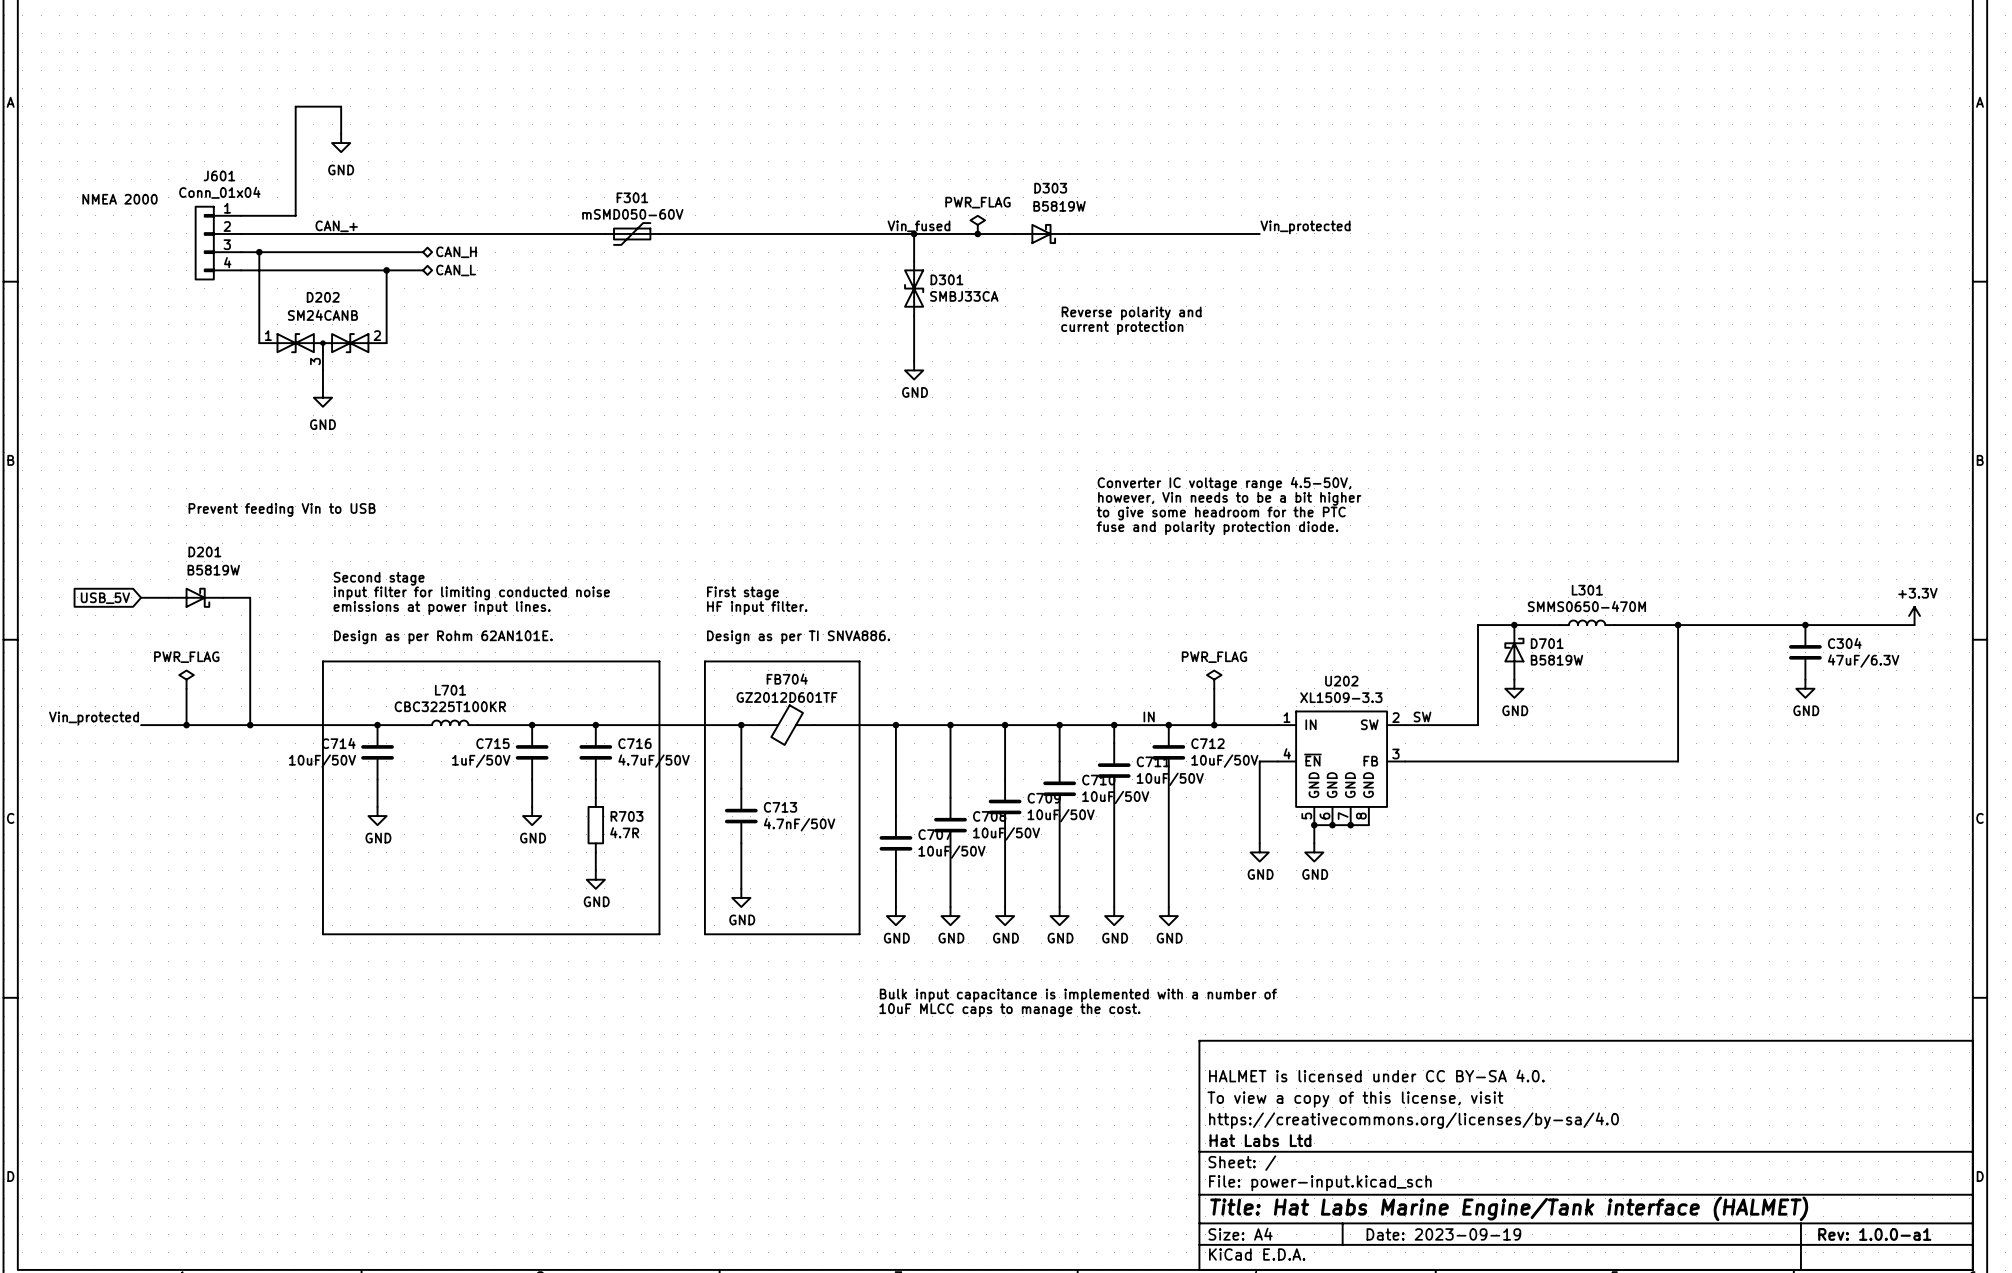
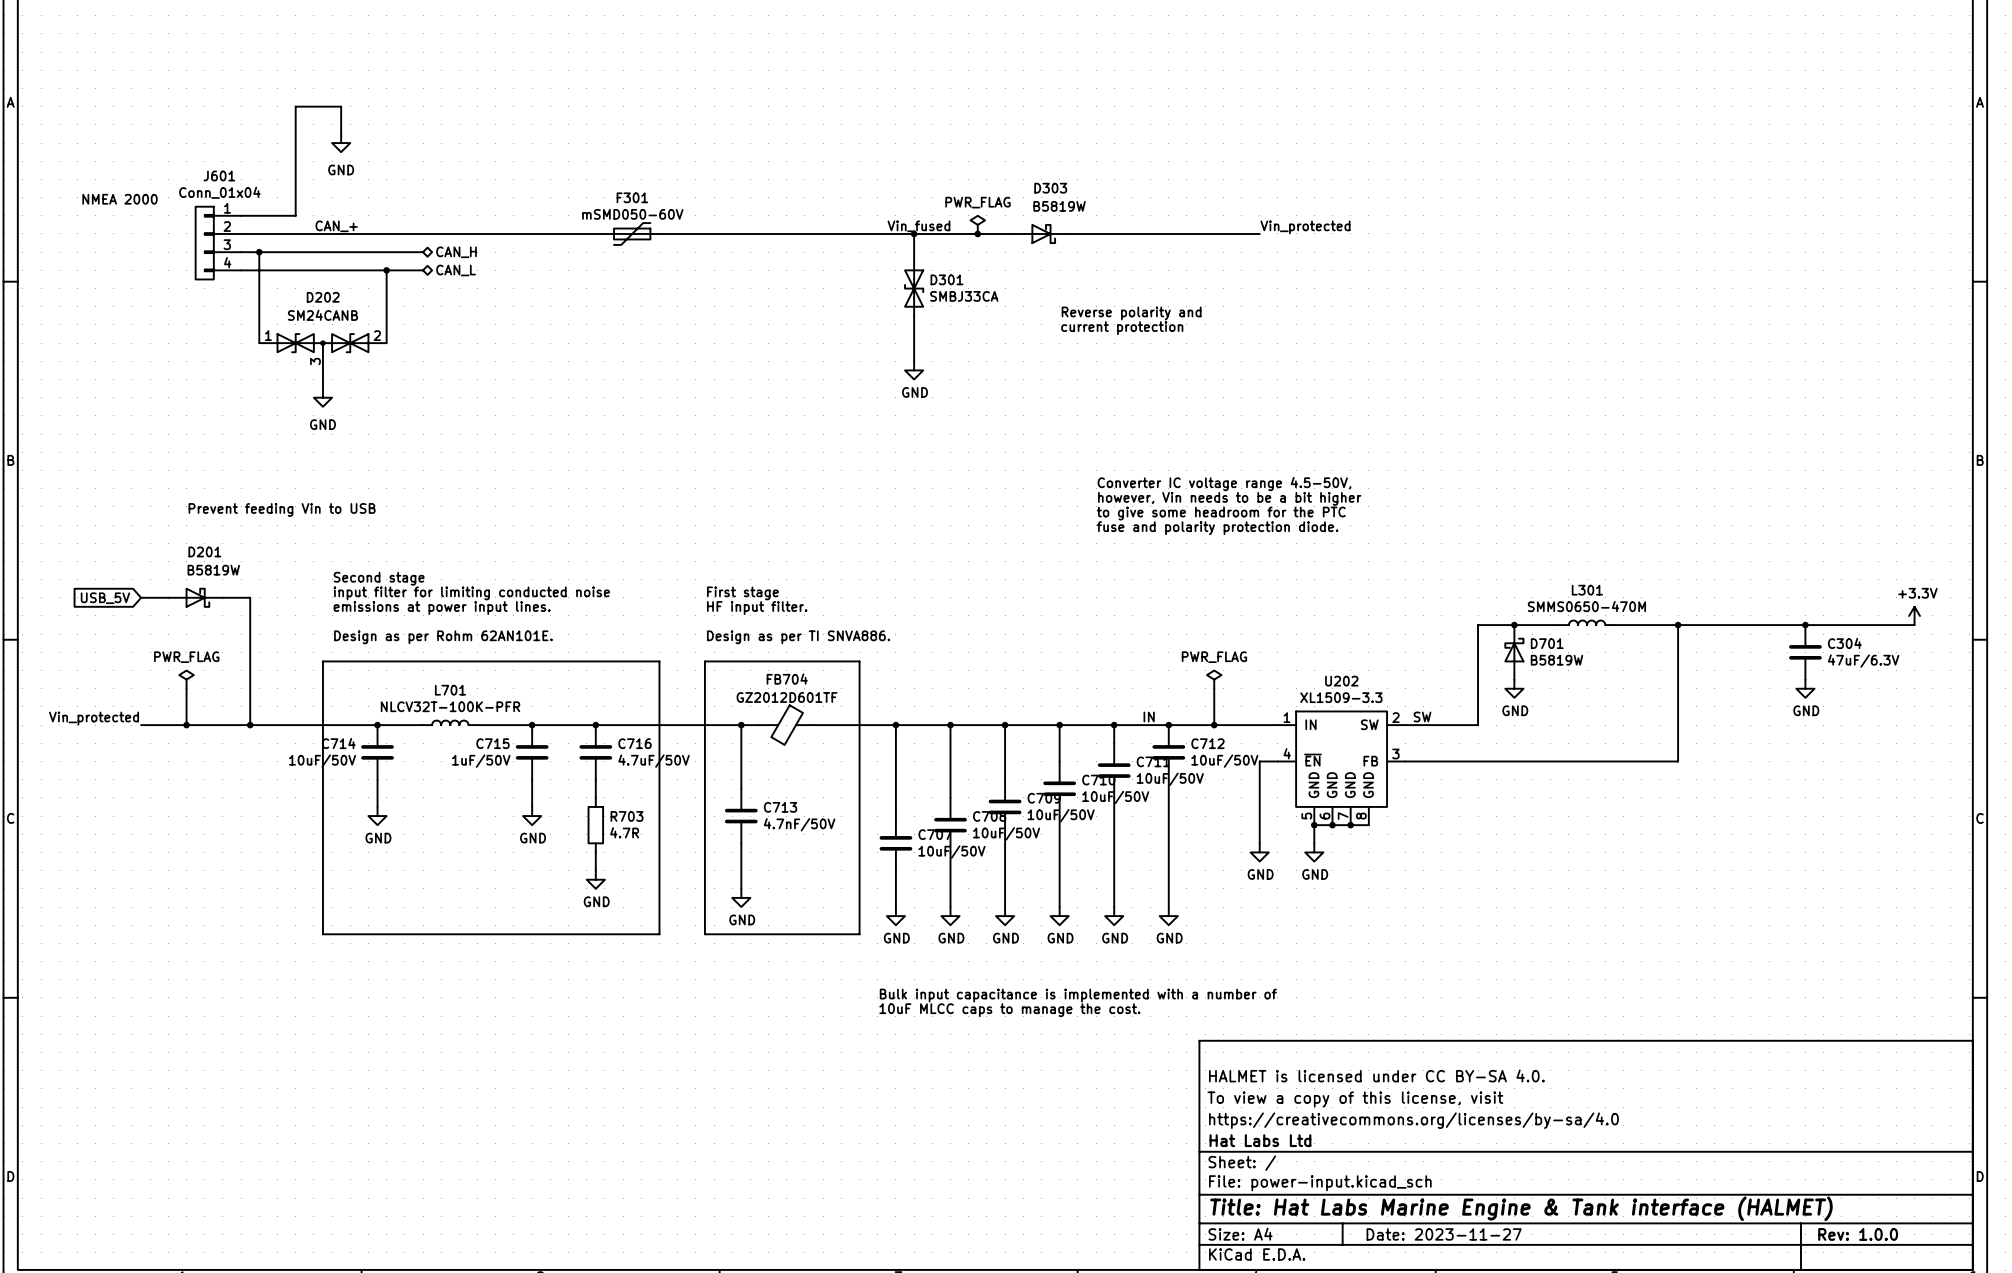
L701 value: CBC3225T100KR (450, 706) -> NLCV32T-100K-PFR (450, 706)
title block: Title: Hat Labs Marine Engine/Tank interface (HALMET) (1509, 1208) -> Title: Hat Labs Marine Engine & Tank interface (HALMET) (1521, 1208)
title block: Date: 2023-09-19 (1443, 1234) -> Date: 2023-11-27 (1444, 1234)
title block: Rev: 1.0.0-a1 (1874, 1234) -> Rev: 1.0.0 (1858, 1234)

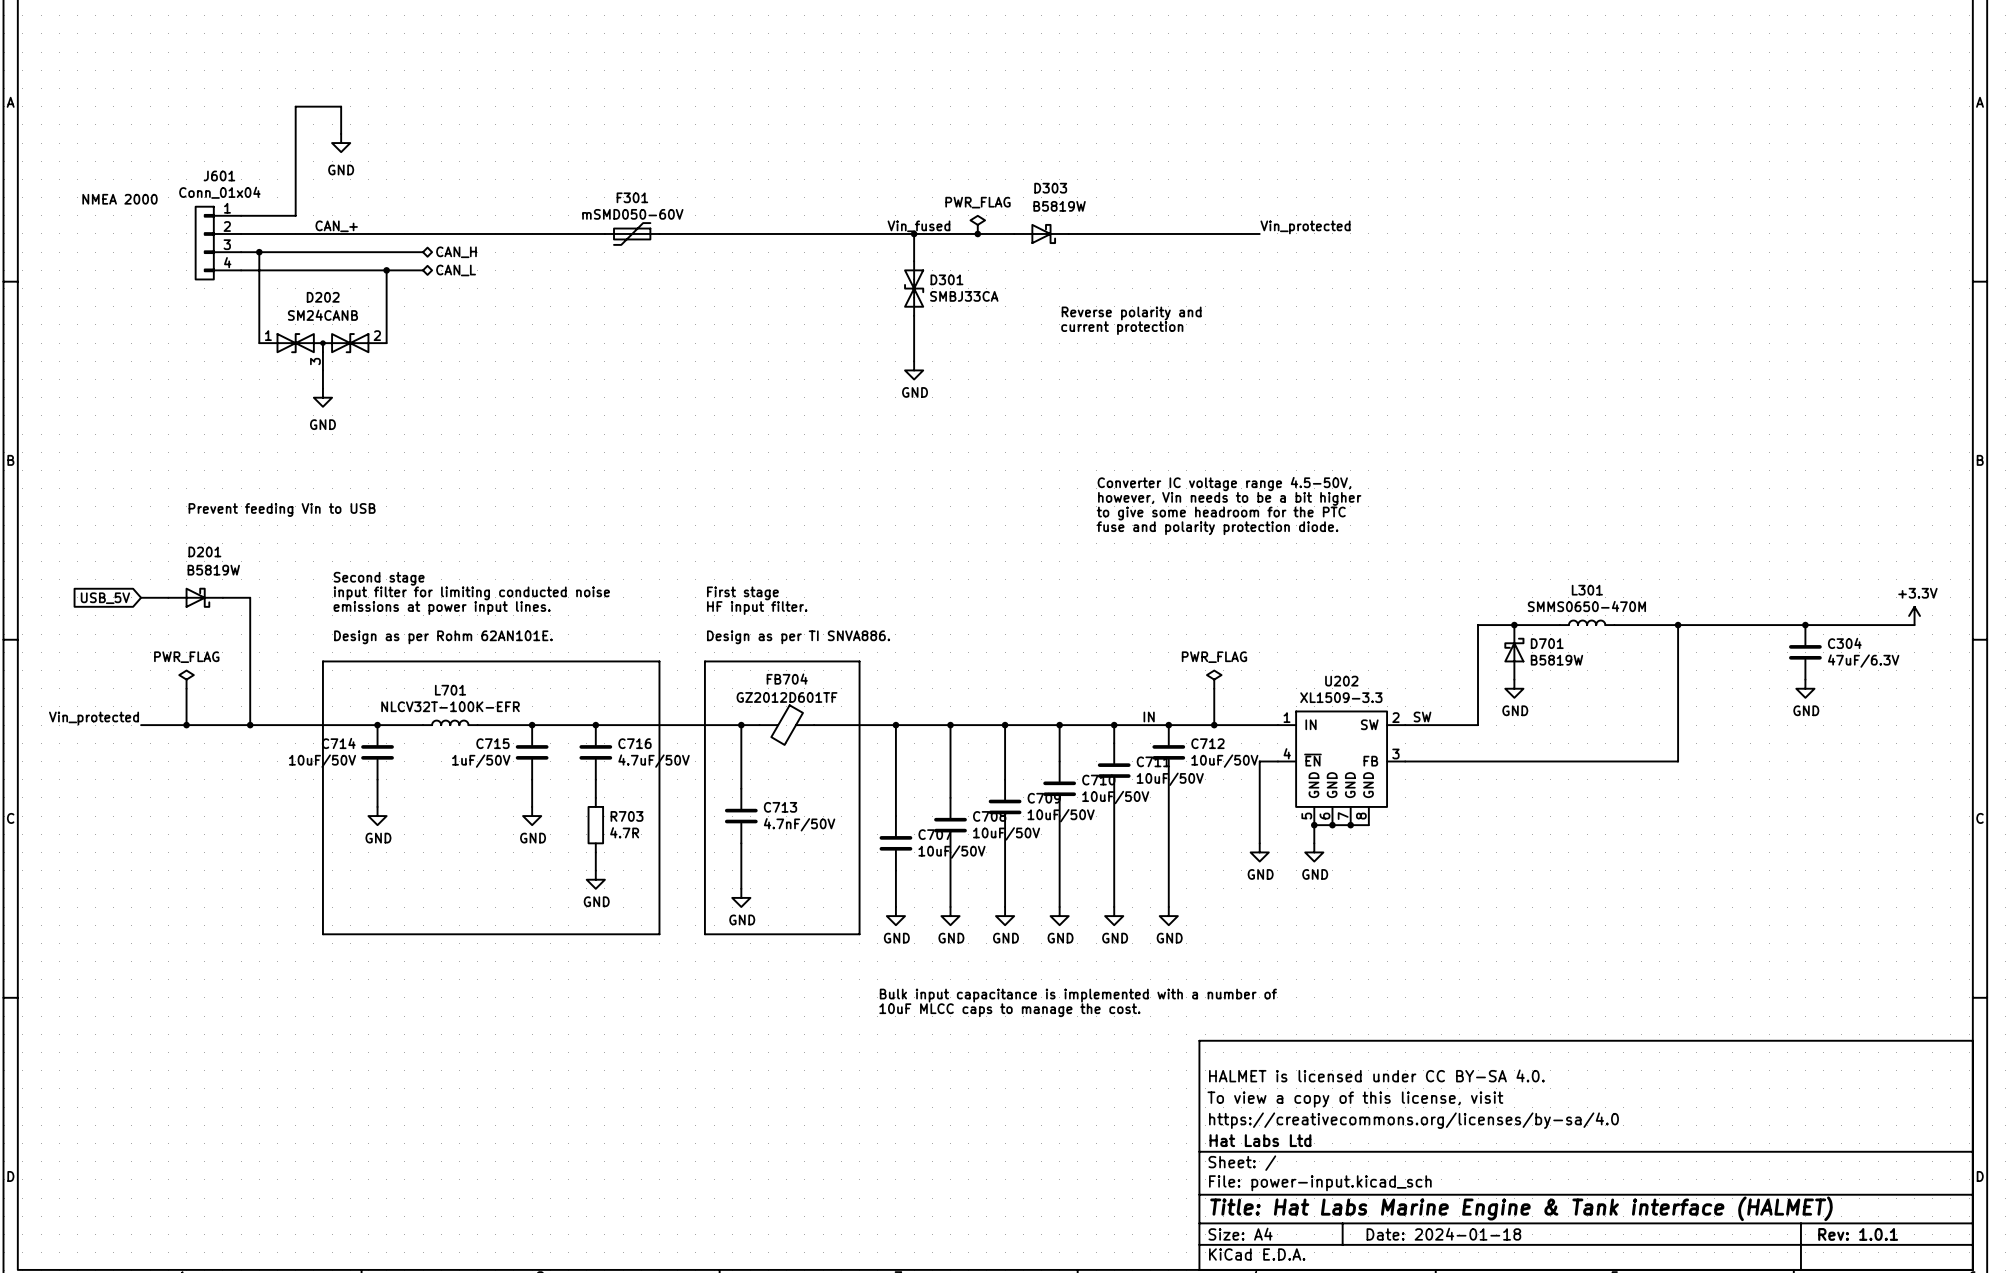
L701 value: NLCV32T-100K-PFR (450, 706) -> NLCV32T-100K-EFR (450, 706)
title block: Date: 2023-11-27 (1444, 1234) -> Date: 2024-01-18 (1443, 1234)
title block: Rev: 1.0.0 (1858, 1234) -> Rev: 1.0.1 (1858, 1234)

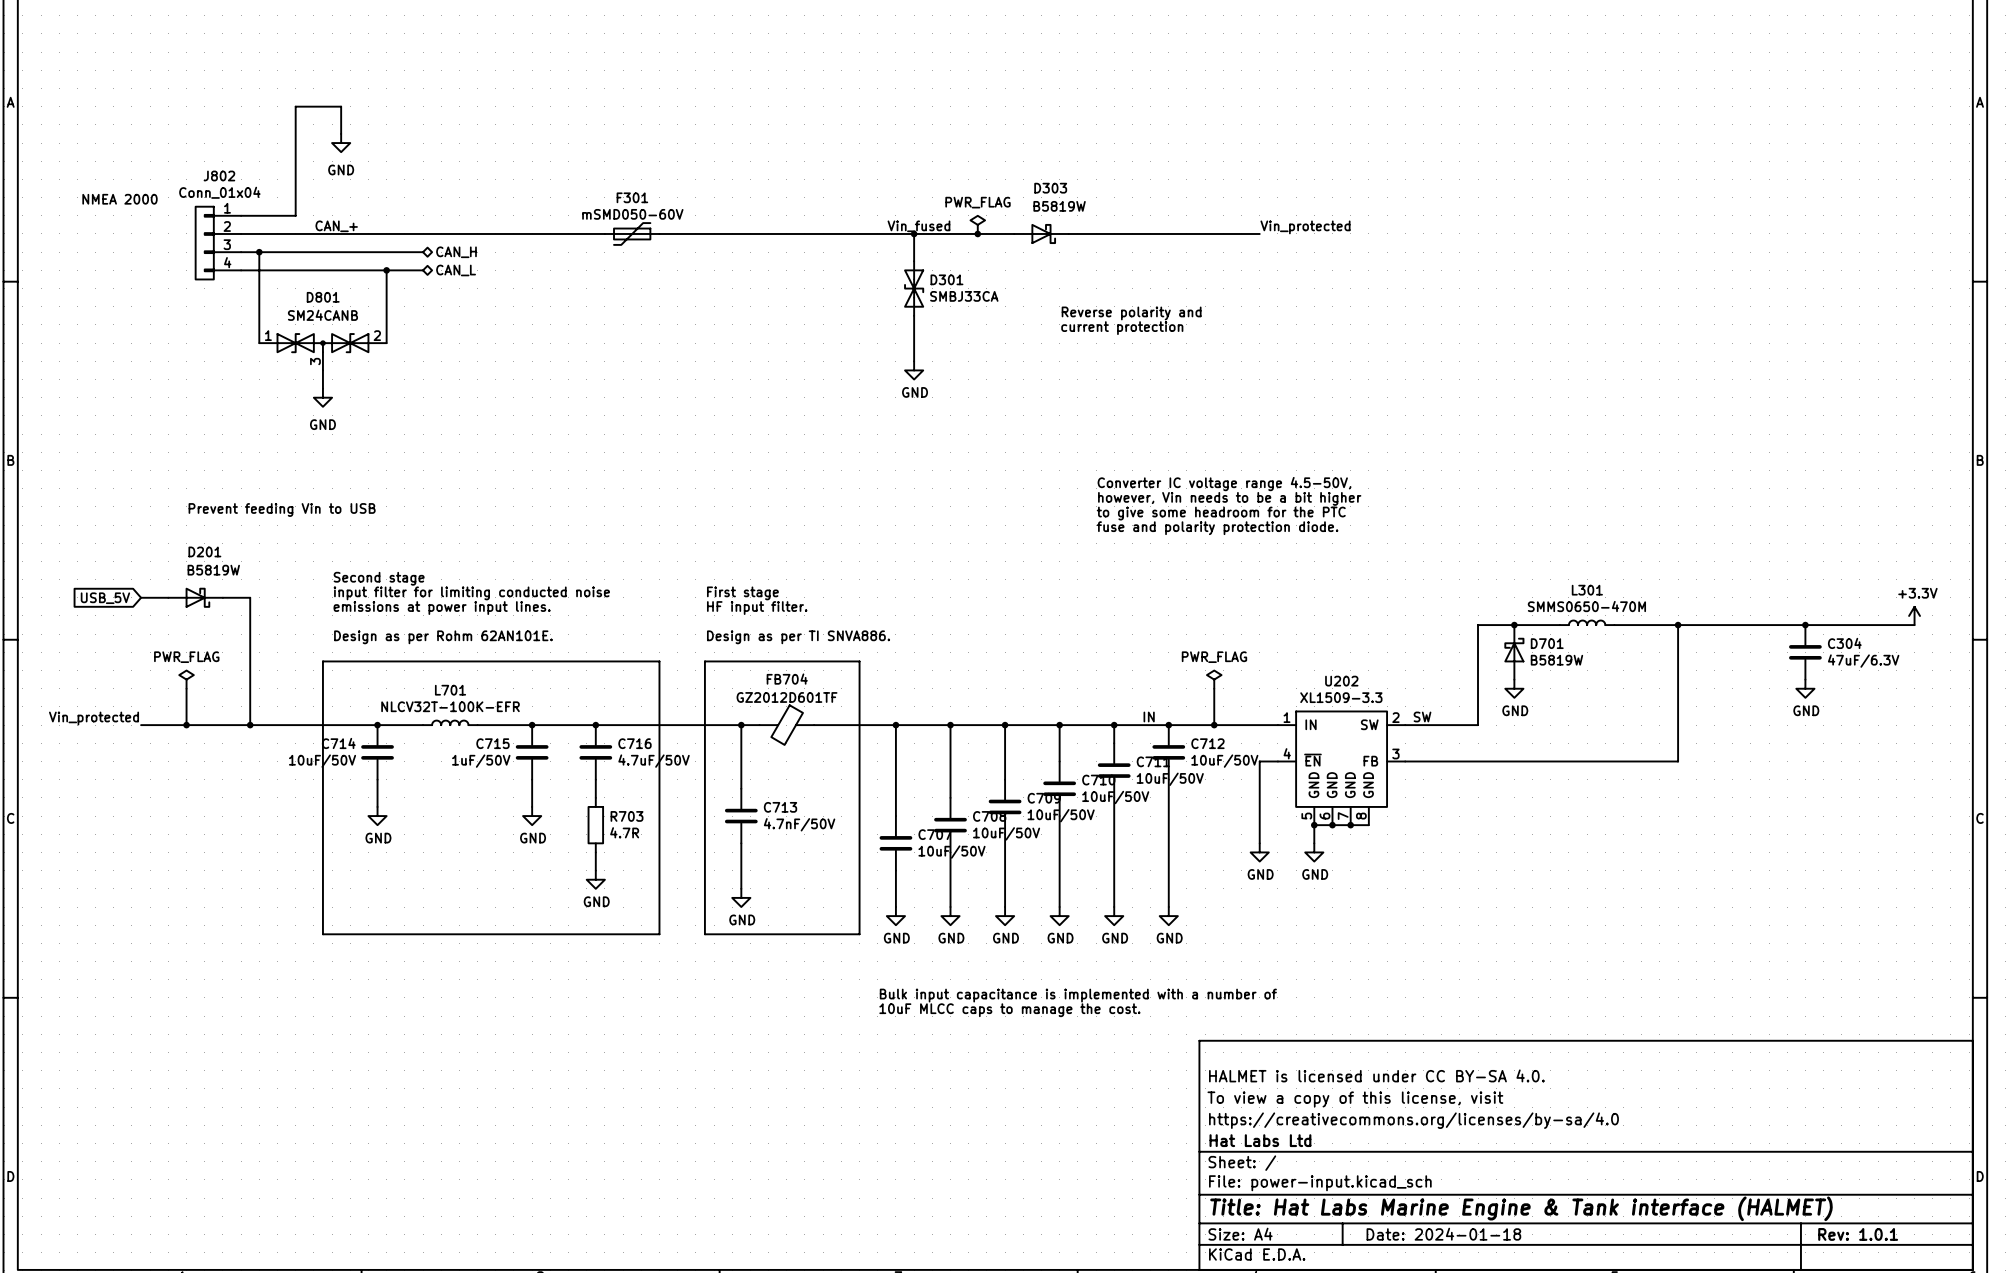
J601 name: J601 (219, 175) -> J802 (219, 175)
D202 name: D202 (323, 297) -> D801 (323, 297)

